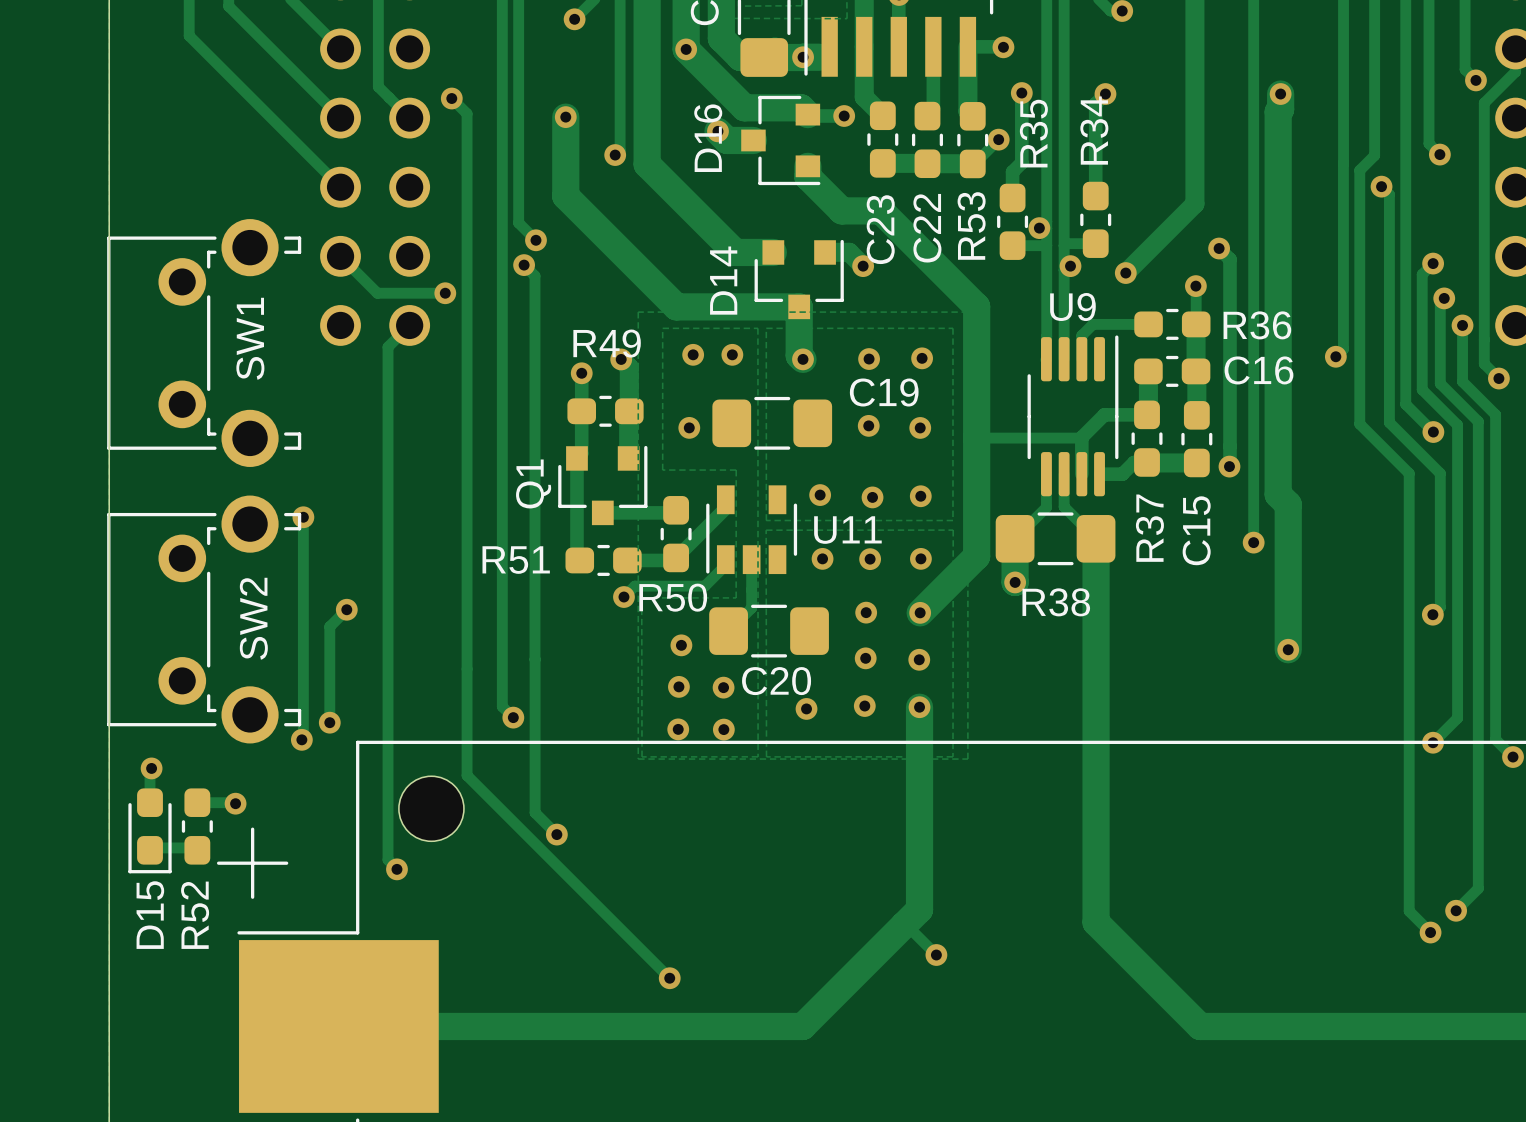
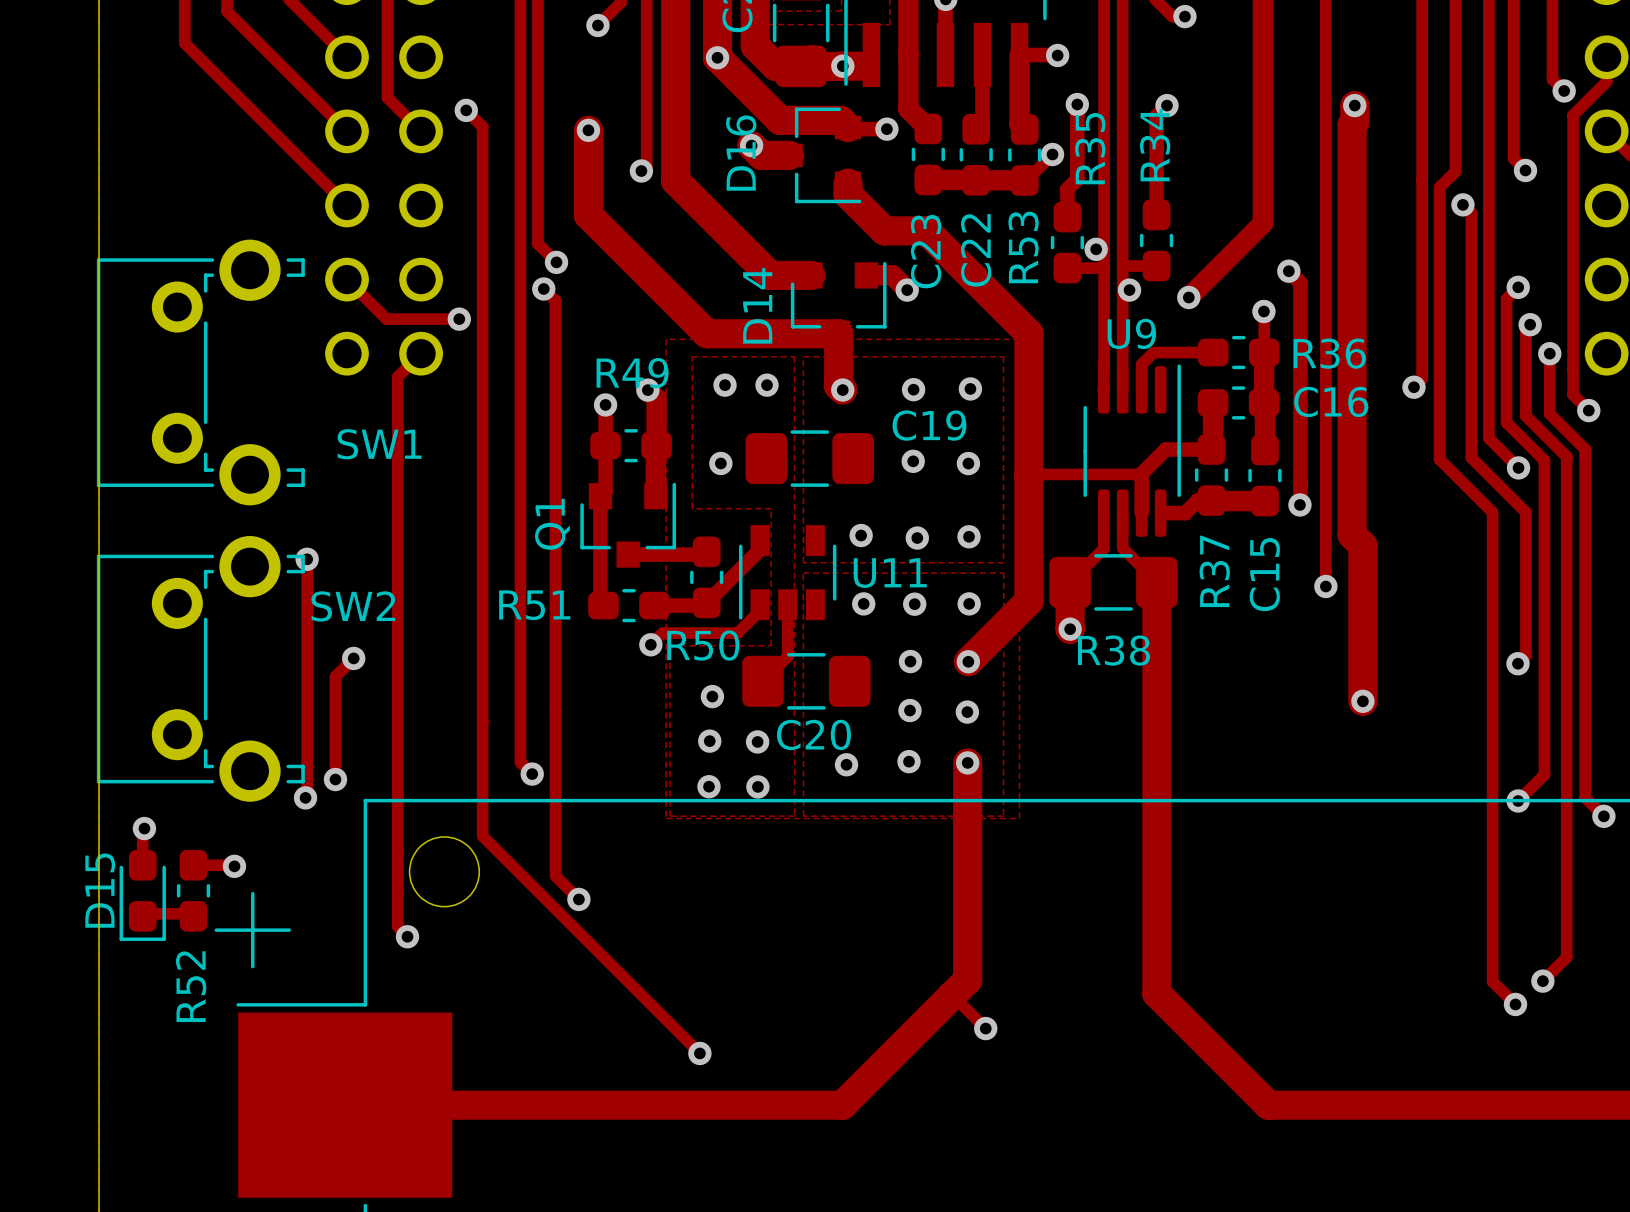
SW1 name rotation: 0° (250, 338) -> 90° clockwise (379, 444)
SW1 name position: SW1 (250, 338) -> SW1 (379, 444)
SW2 name rotation: 0° (253, 618) -> 90° clockwise (353, 606)
SW2 name position: SW2 (253, 618) -> SW2 (353, 606)
D15 name position: D15 (150, 915) -> D15 (100, 890)

